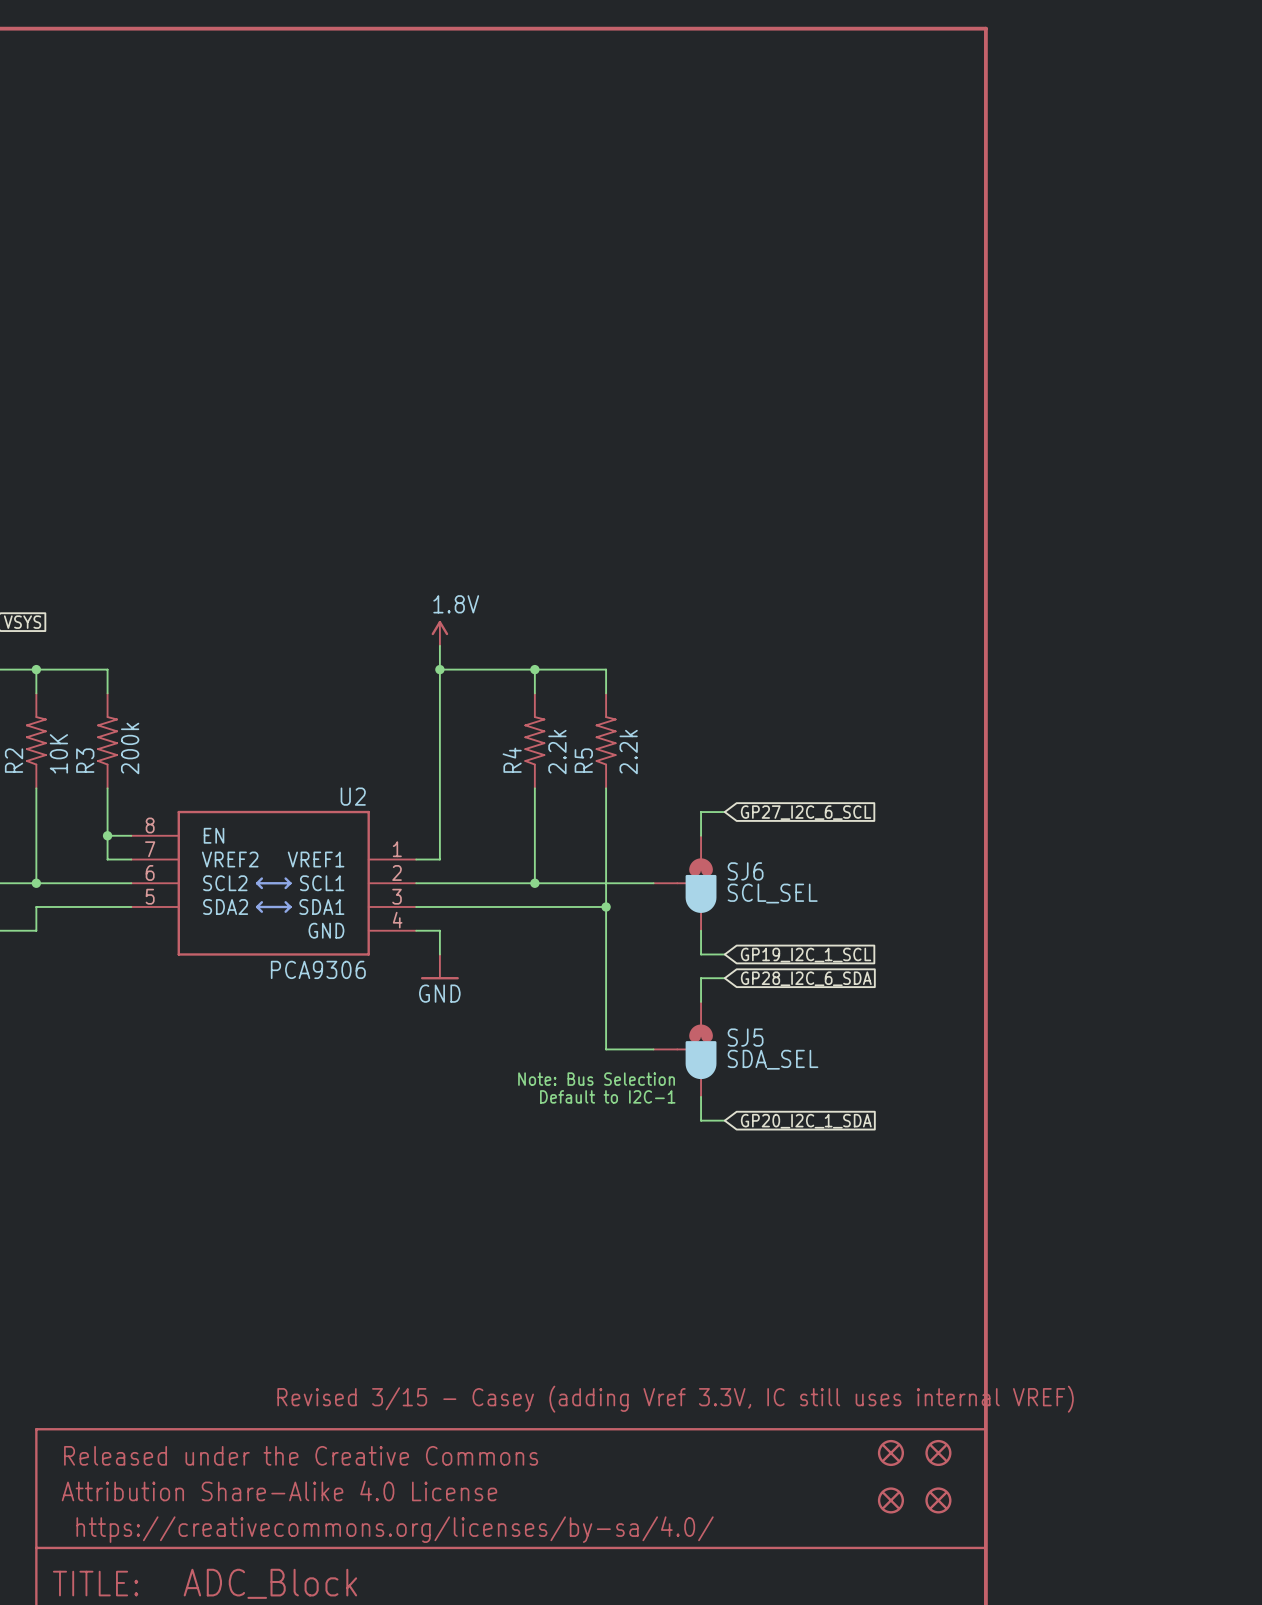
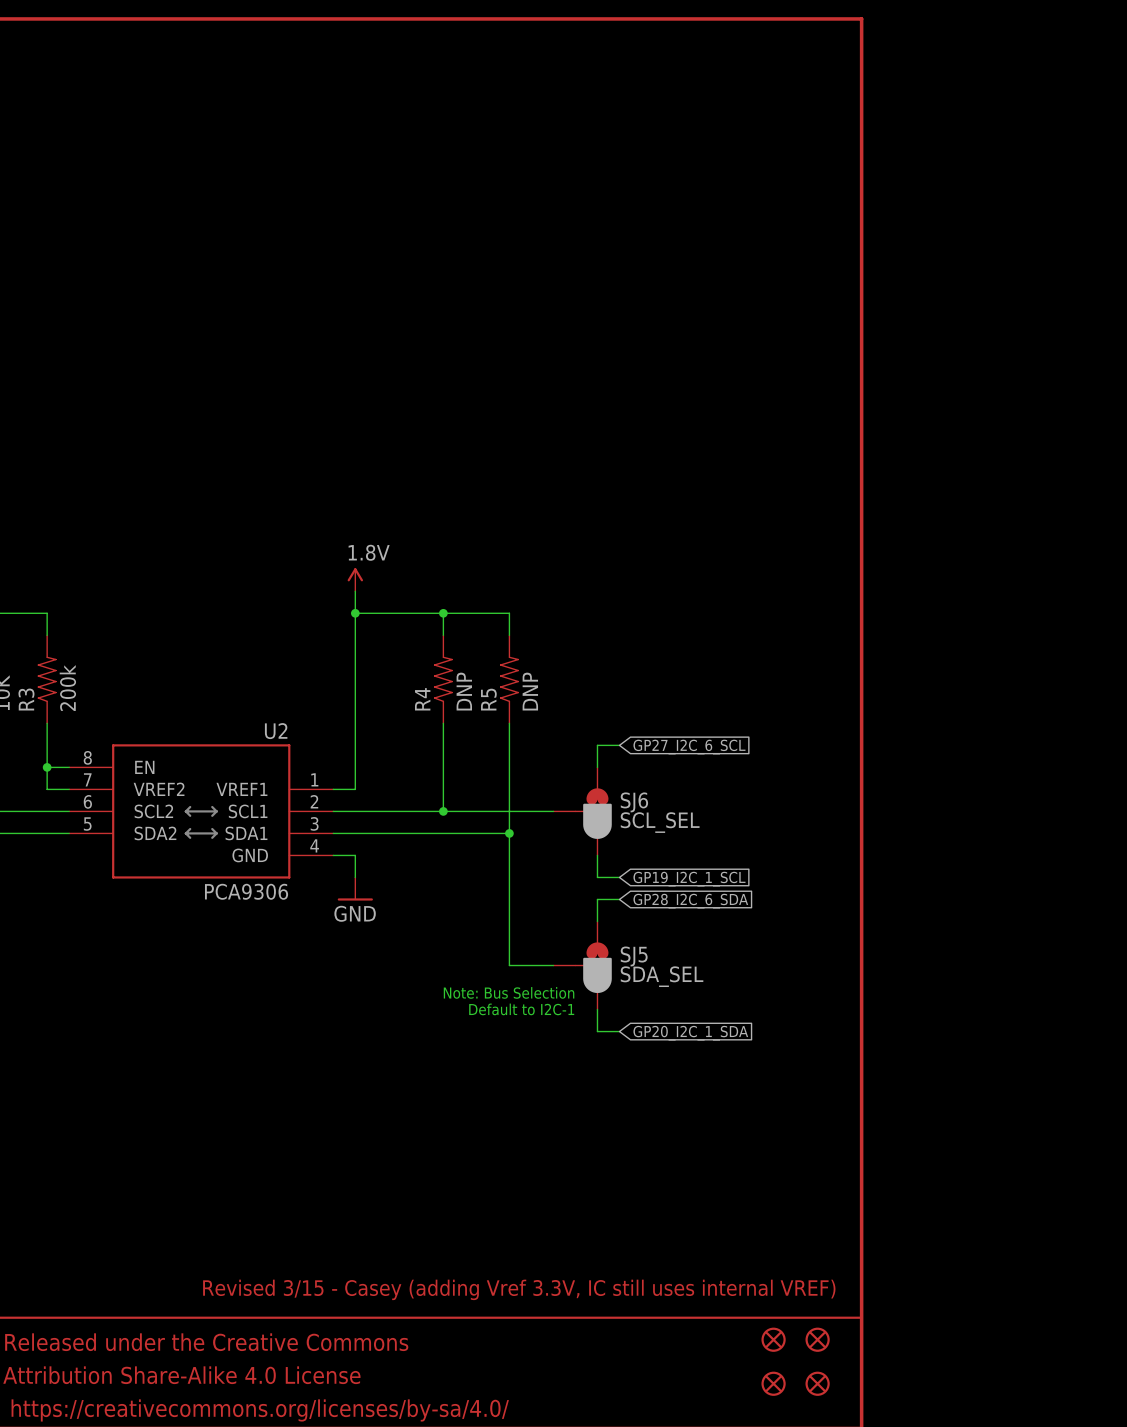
R4 value: 2.2k (557, 752) -> DNP (464, 691)
R5 value: 2.2k (628, 752) -> DNP (530, 691)

